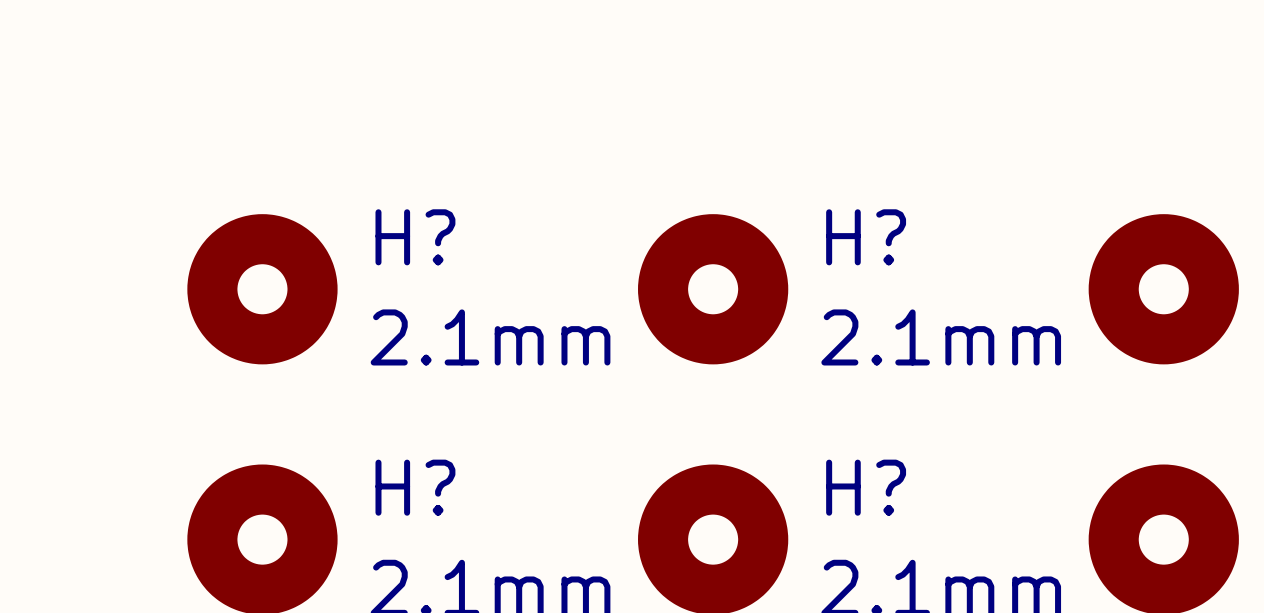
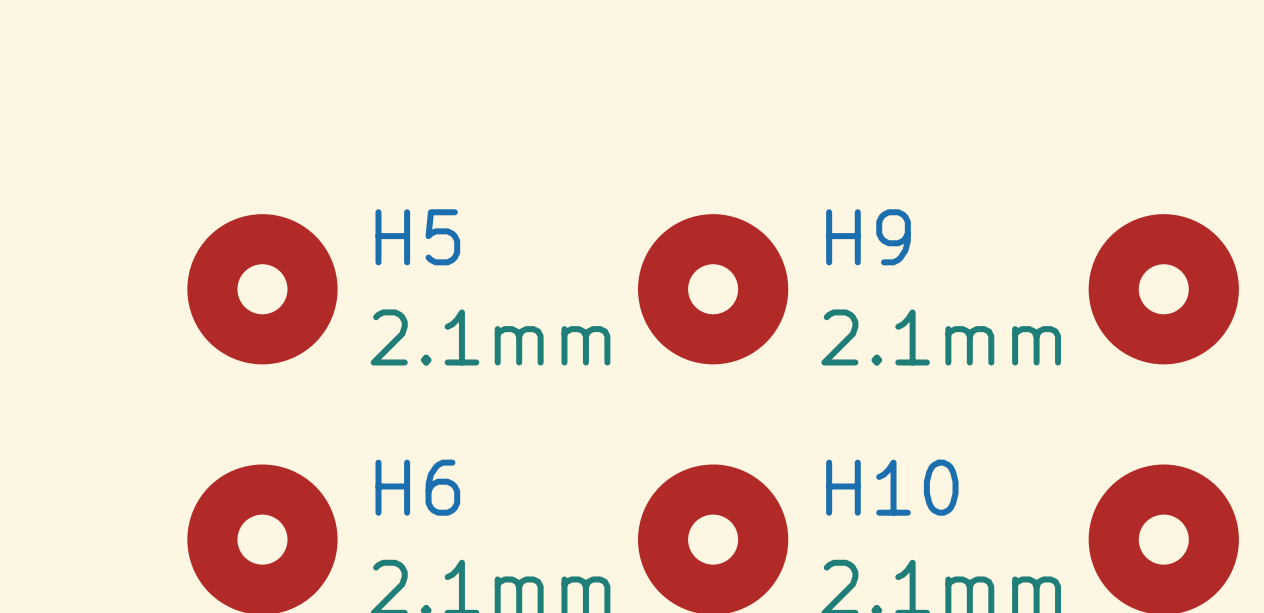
H? name: H? (415, 237) -> H5 (417, 237)
H? name: H? (866, 237) -> H9 (868, 237)
H? name: H? (415, 487) -> H6 (417, 487)
H? name: H? (866, 487) -> H10 (892, 487)

